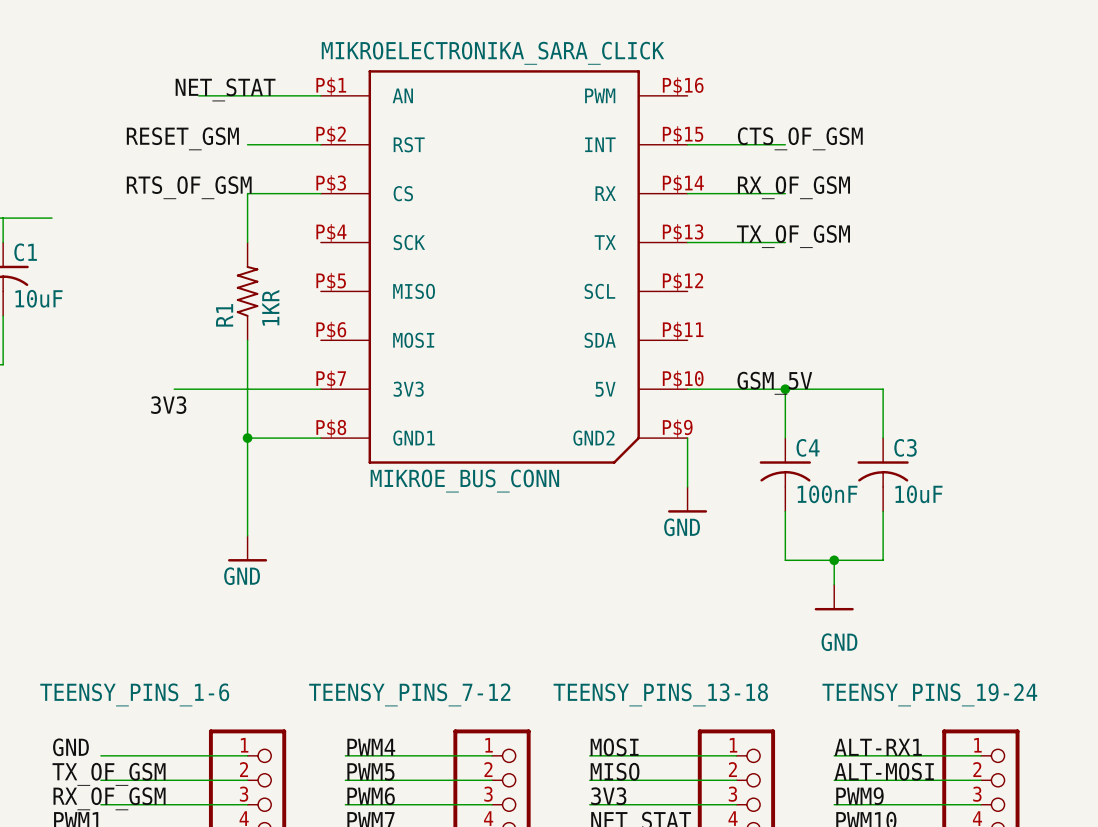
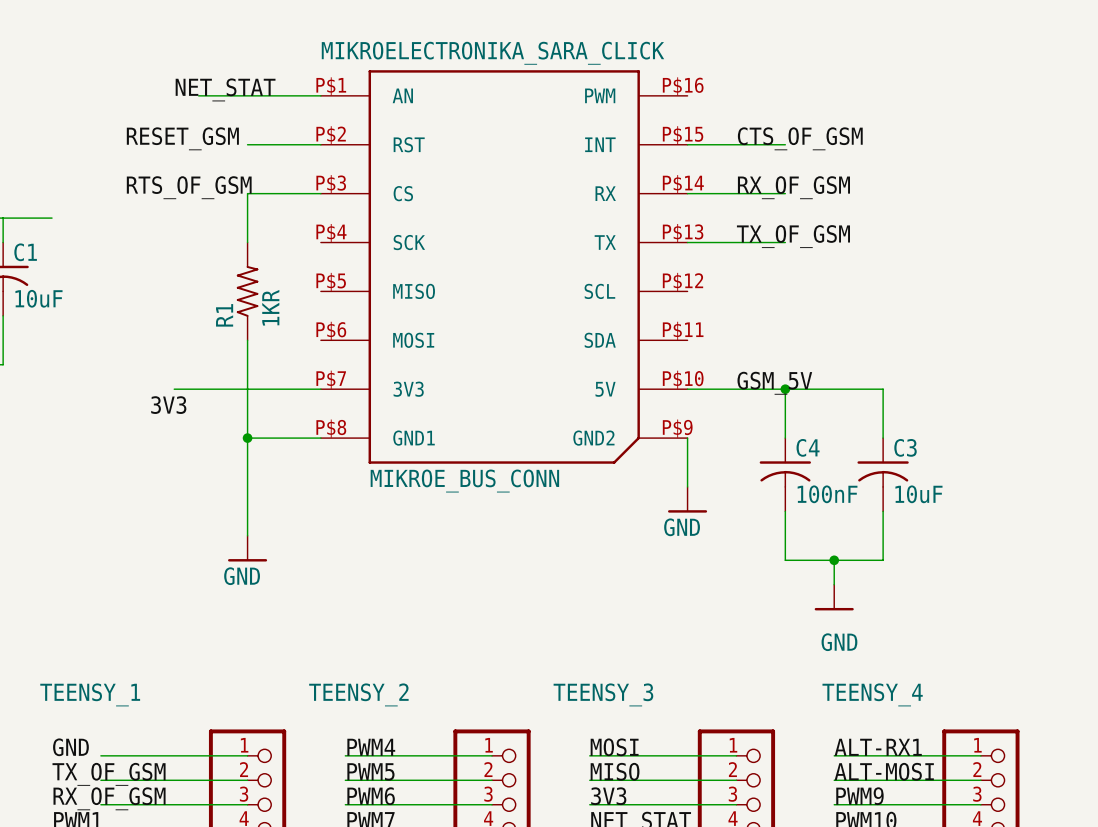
TEENSY_PINS_1-6 name: TEENSY_PINS_1-6 (134, 694) -> TEENSY_1 (90, 694)
TEENSY_PINS_7-12 name: TEENSY_PINS_7-12 (409, 694) -> TEENSY_2 (358, 694)
TEENSY_PINS_13-18 name: TEENSY_PINS_13-18 (660, 694) -> TEENSY_3 (603, 694)
TEENSY_PINS_19-24 name: TEENSY_PINS_19-24 (929, 694) -> TEENSY_4 (872, 694)

